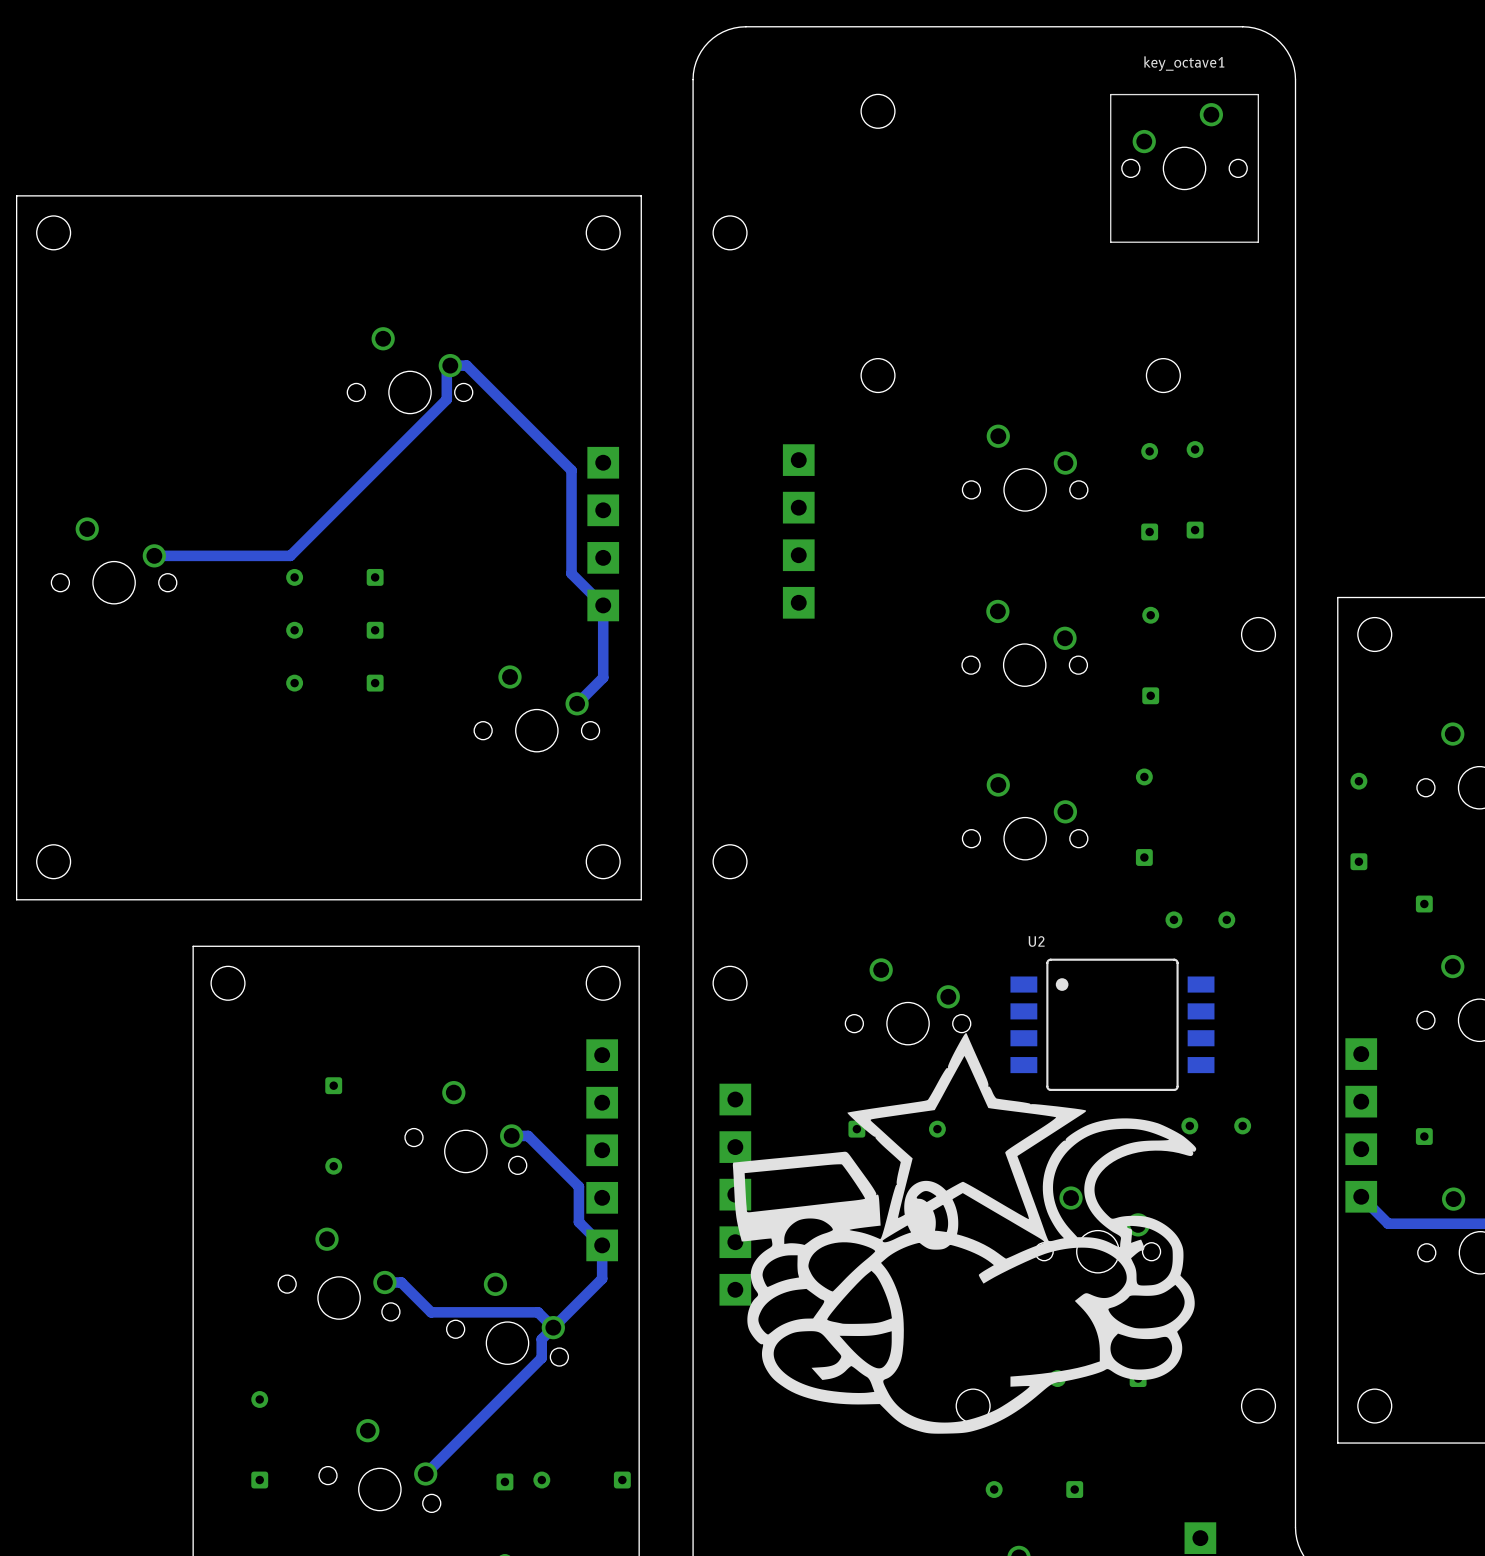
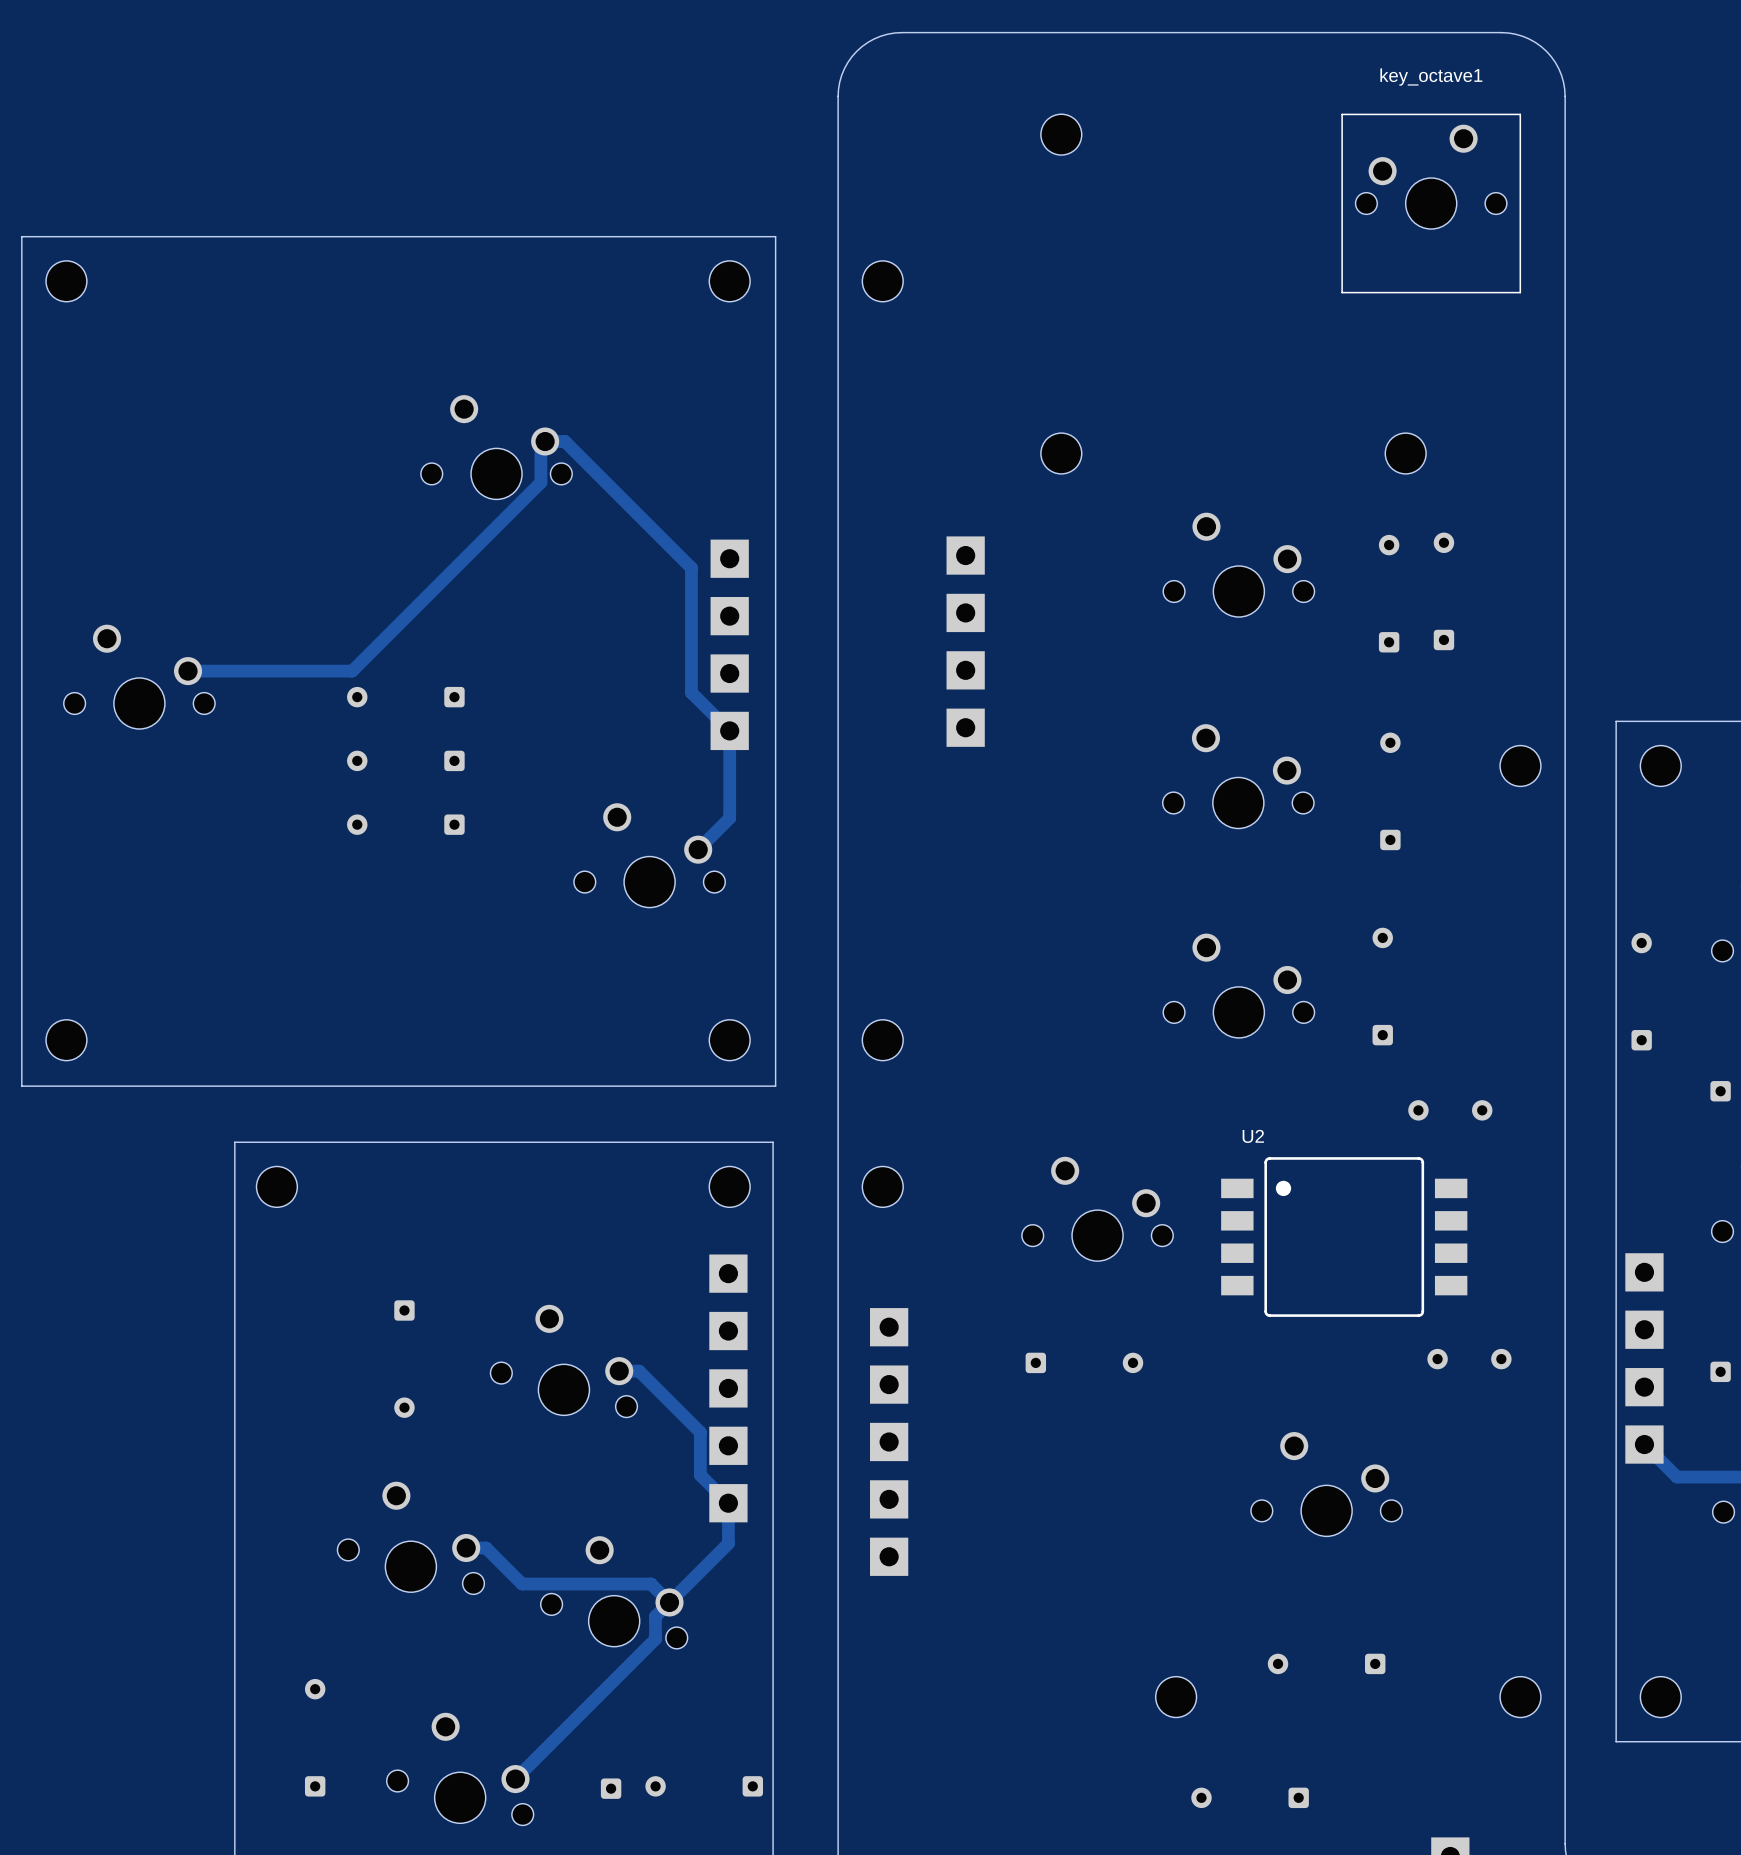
drawing: [732, 1033, 1197, 1434] -> none

